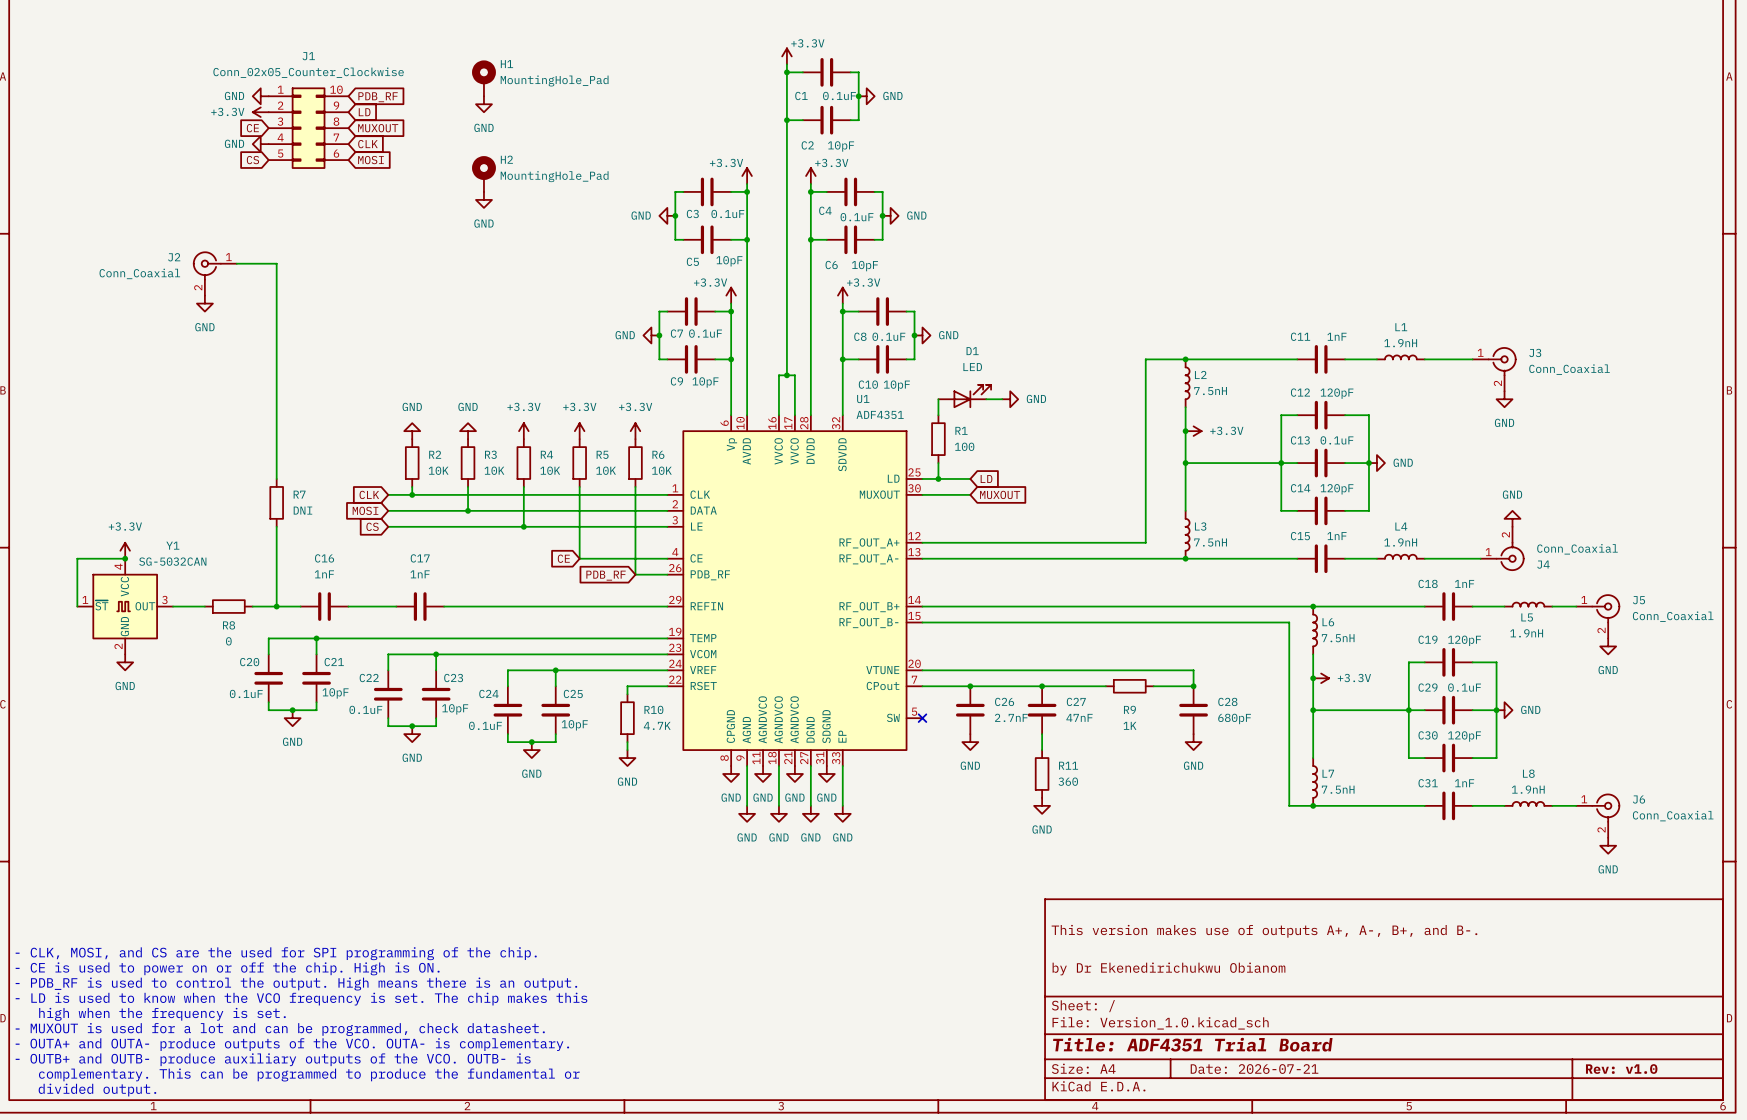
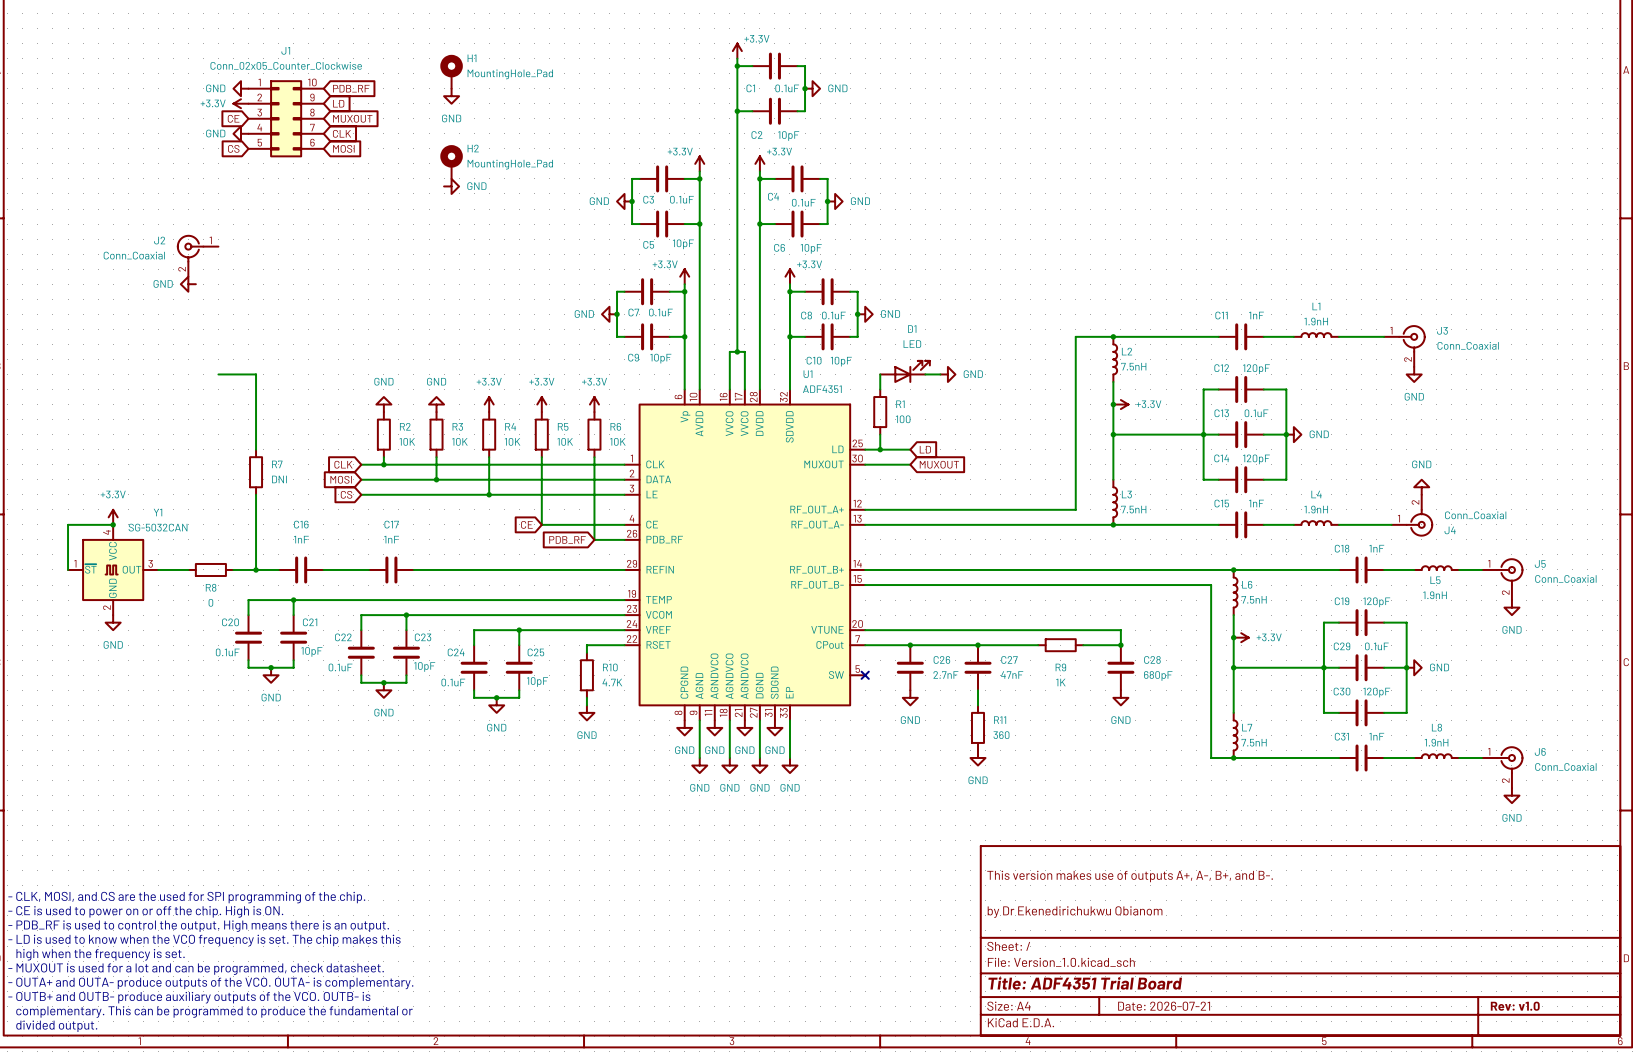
power symbol rotation: 0° (483, 199) -> 90° counterclockwise (451, 186)
wire: (236, 263) (276, 263) (276, 399) -> (218, 374) (256, 374)
power symbol rotation: 0° (204, 303) -> 90° clockwise (188, 284)

